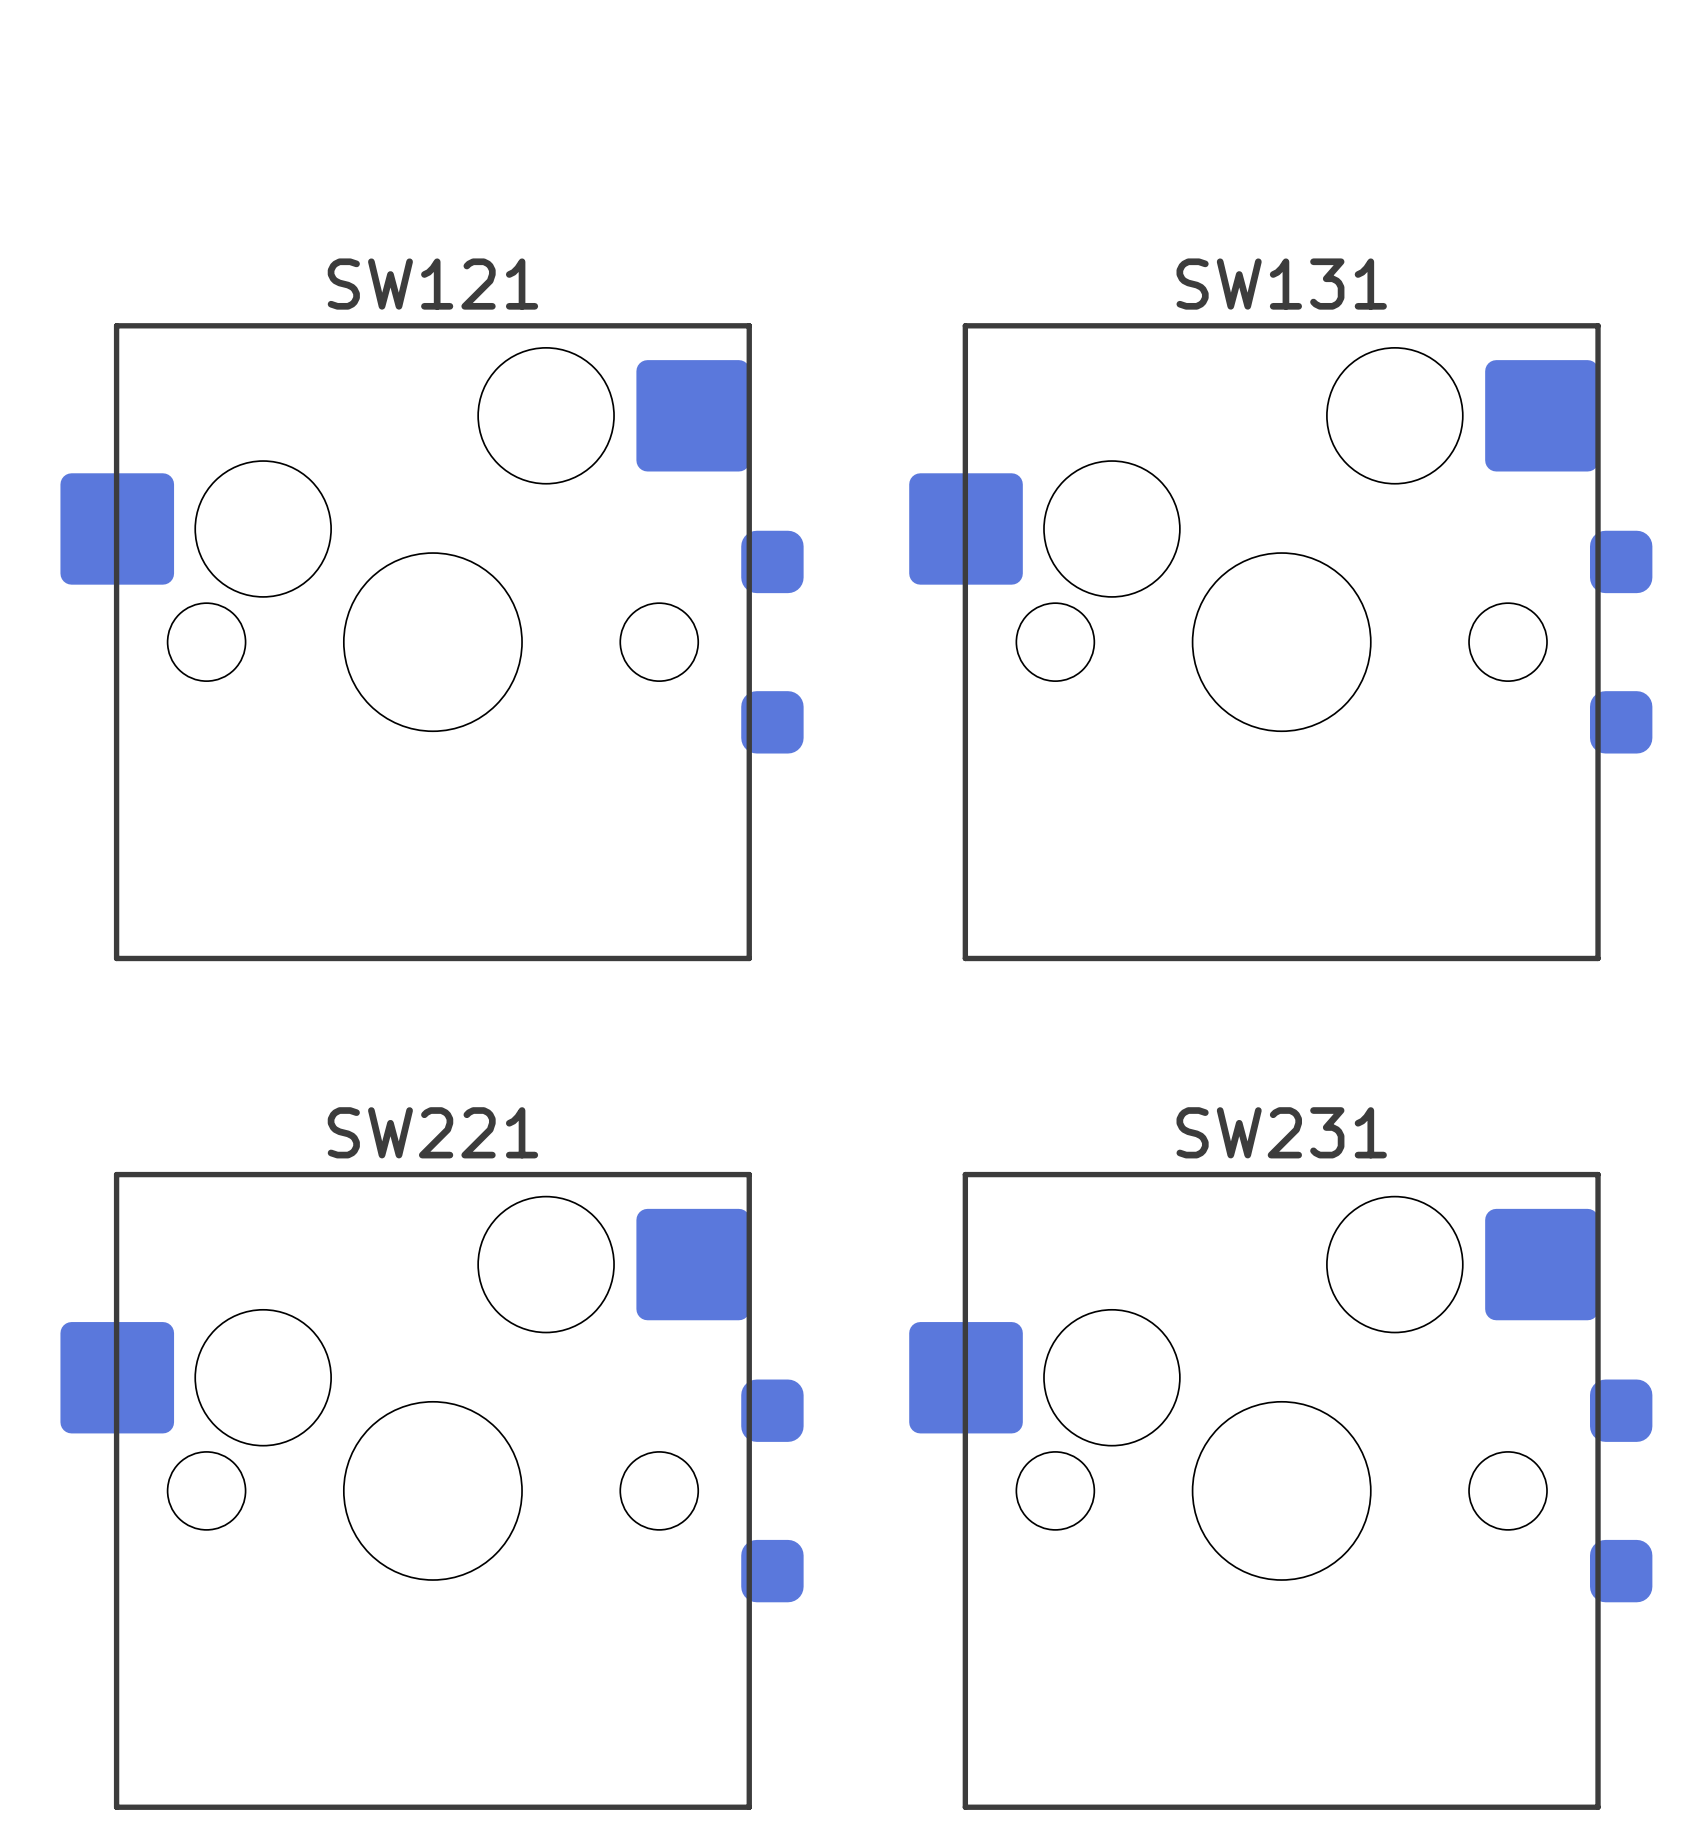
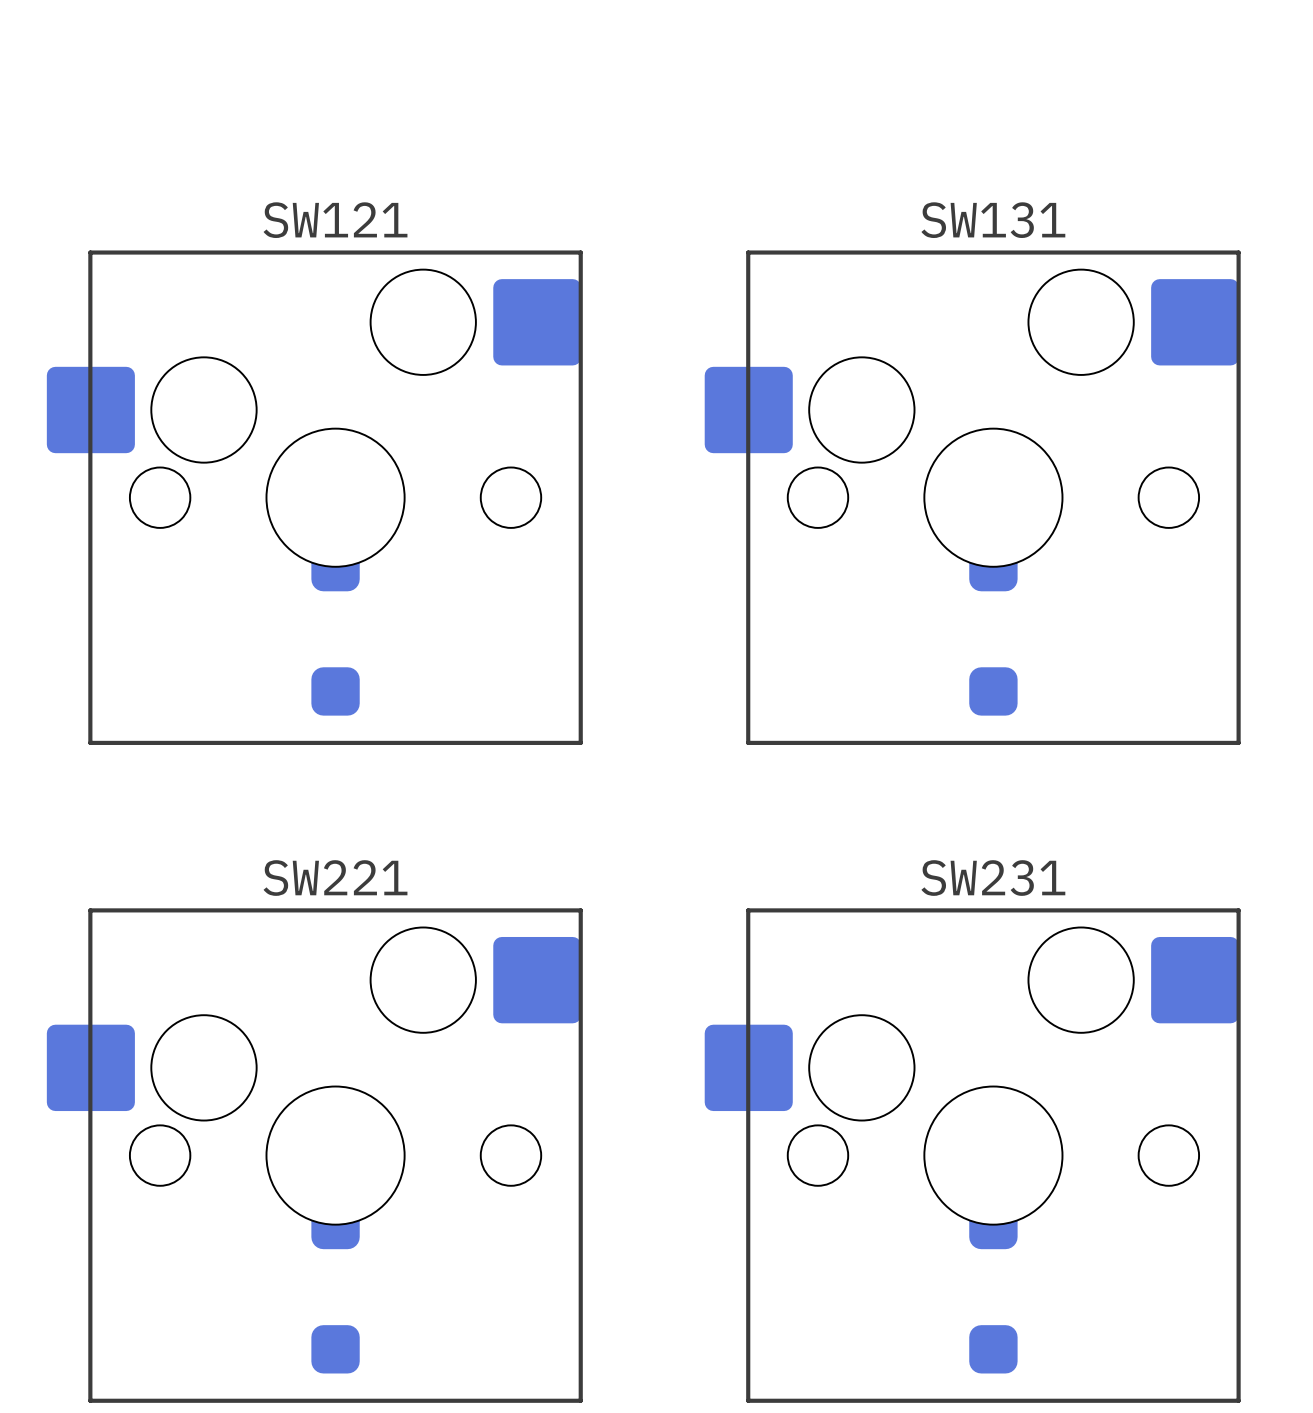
part: (772, 642) -> none
part: (1621, 642) -> none
part: none -> (335, 629)
part: none -> (993, 629)
part: (772, 1490) -> none
part: (1621, 1490) -> none
part: none -> (335, 1287)
part: none -> (993, 1287)

